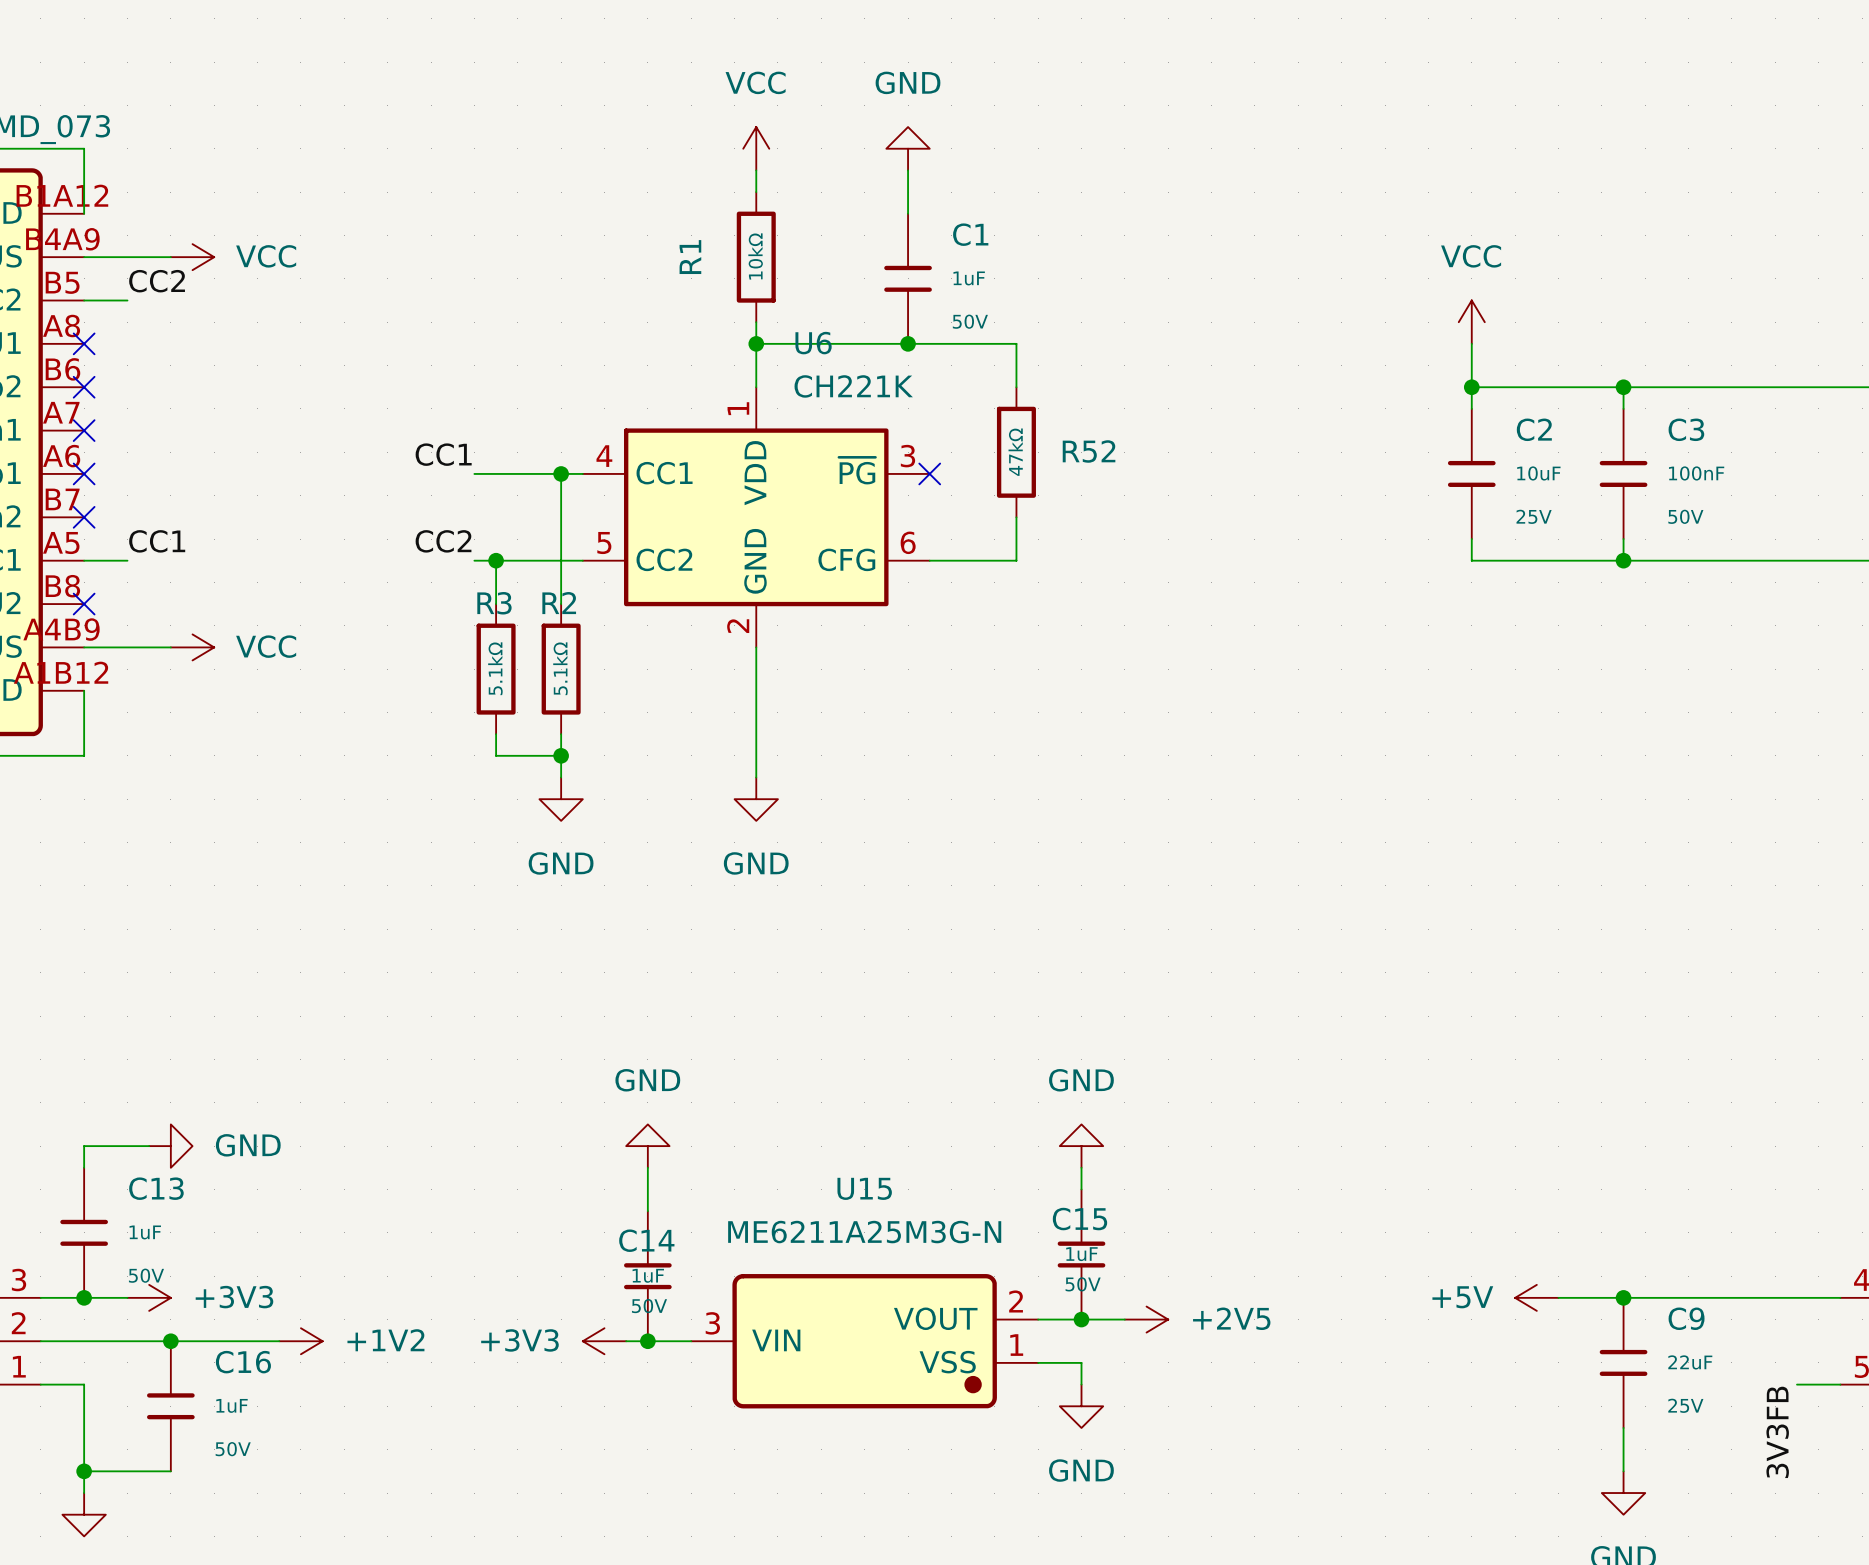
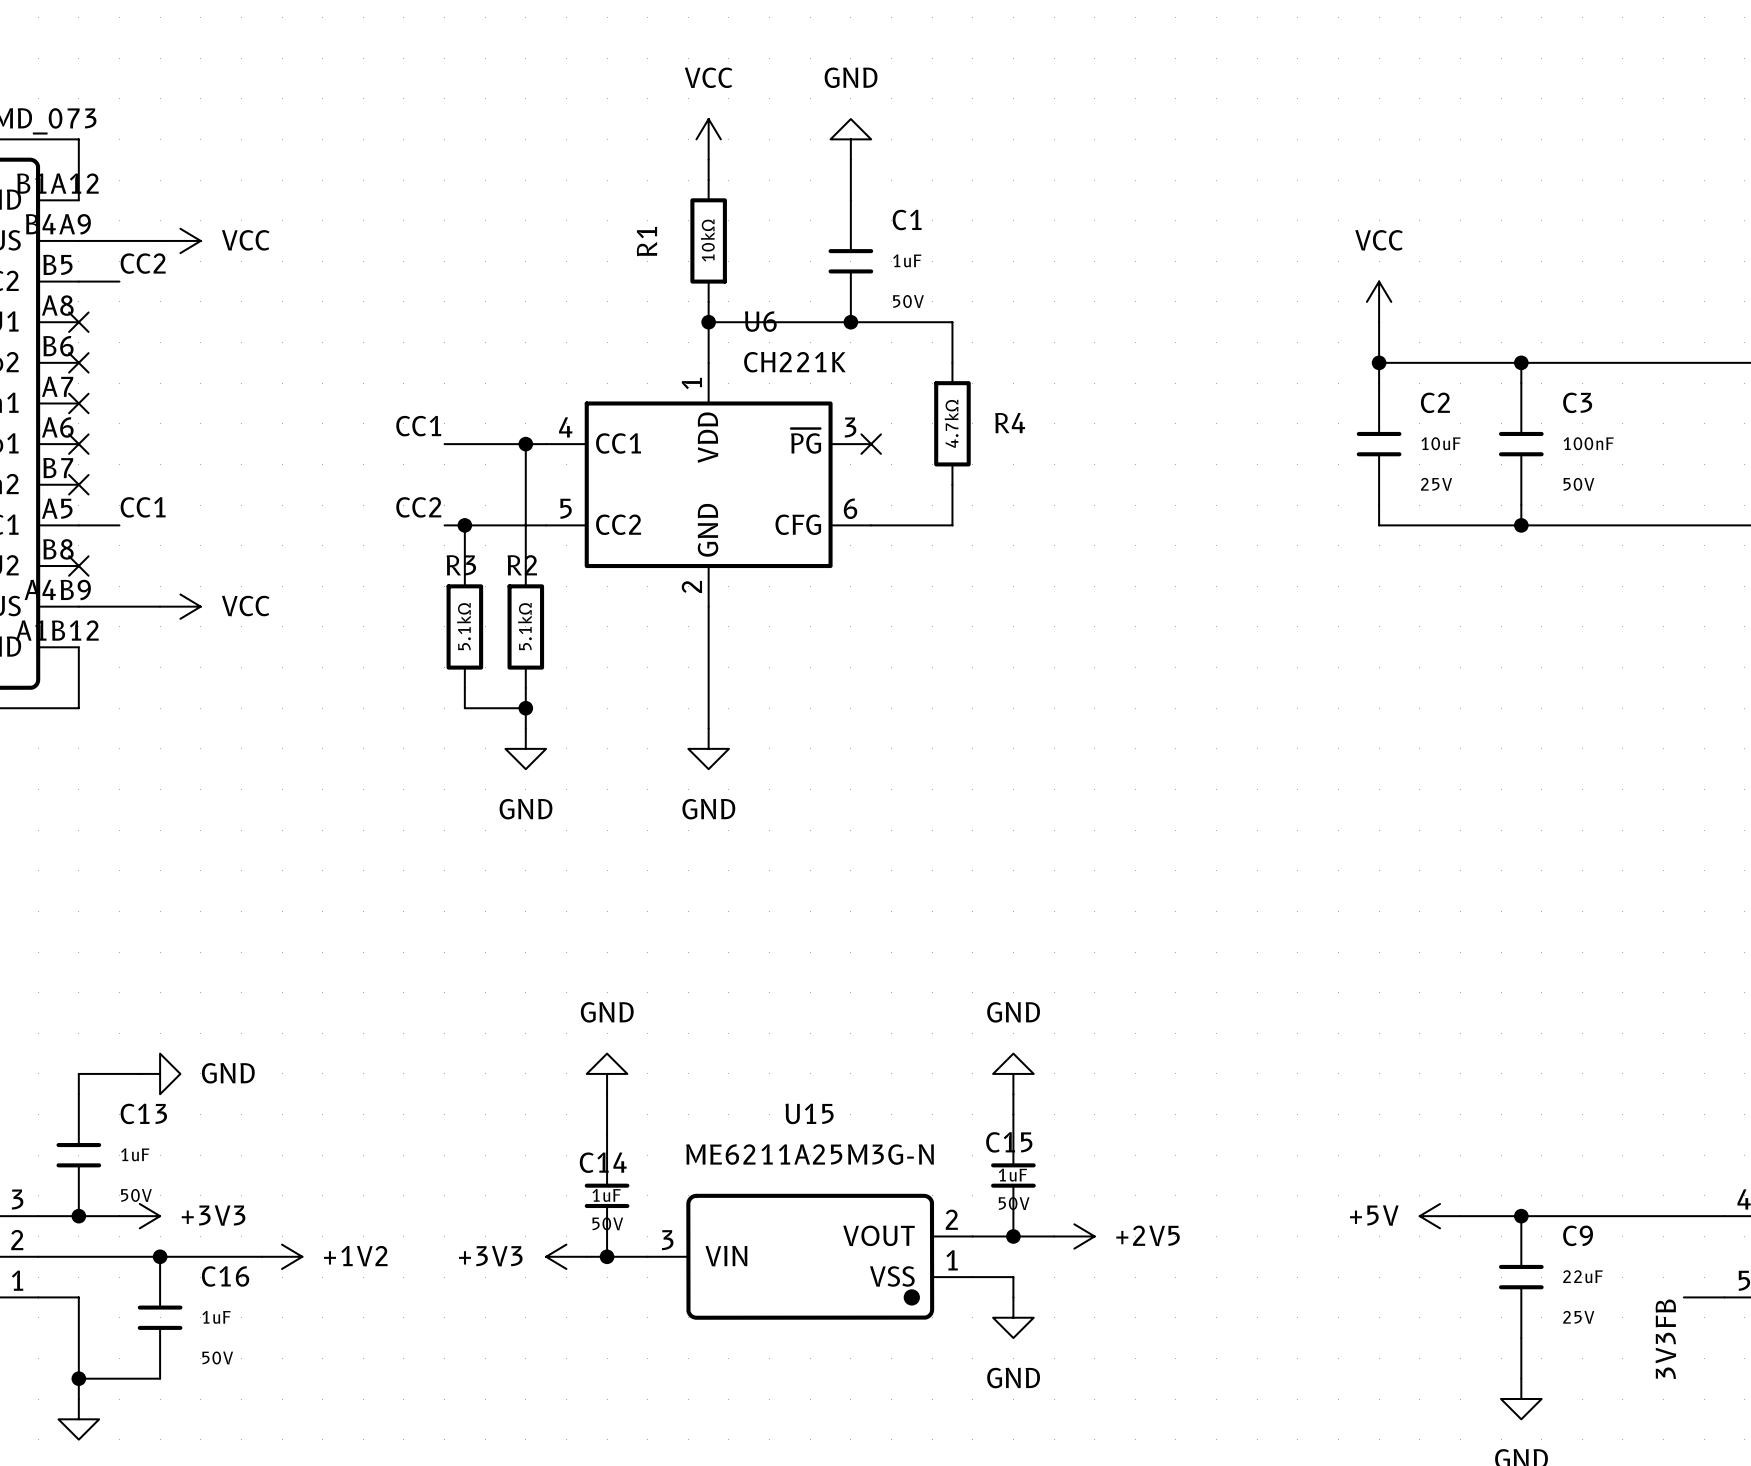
R52 name: R52 (1089, 451) -> R4 (1010, 423)
R52 value: 47kΩ (1015, 452) -> 4.7kΩ (951, 423)

